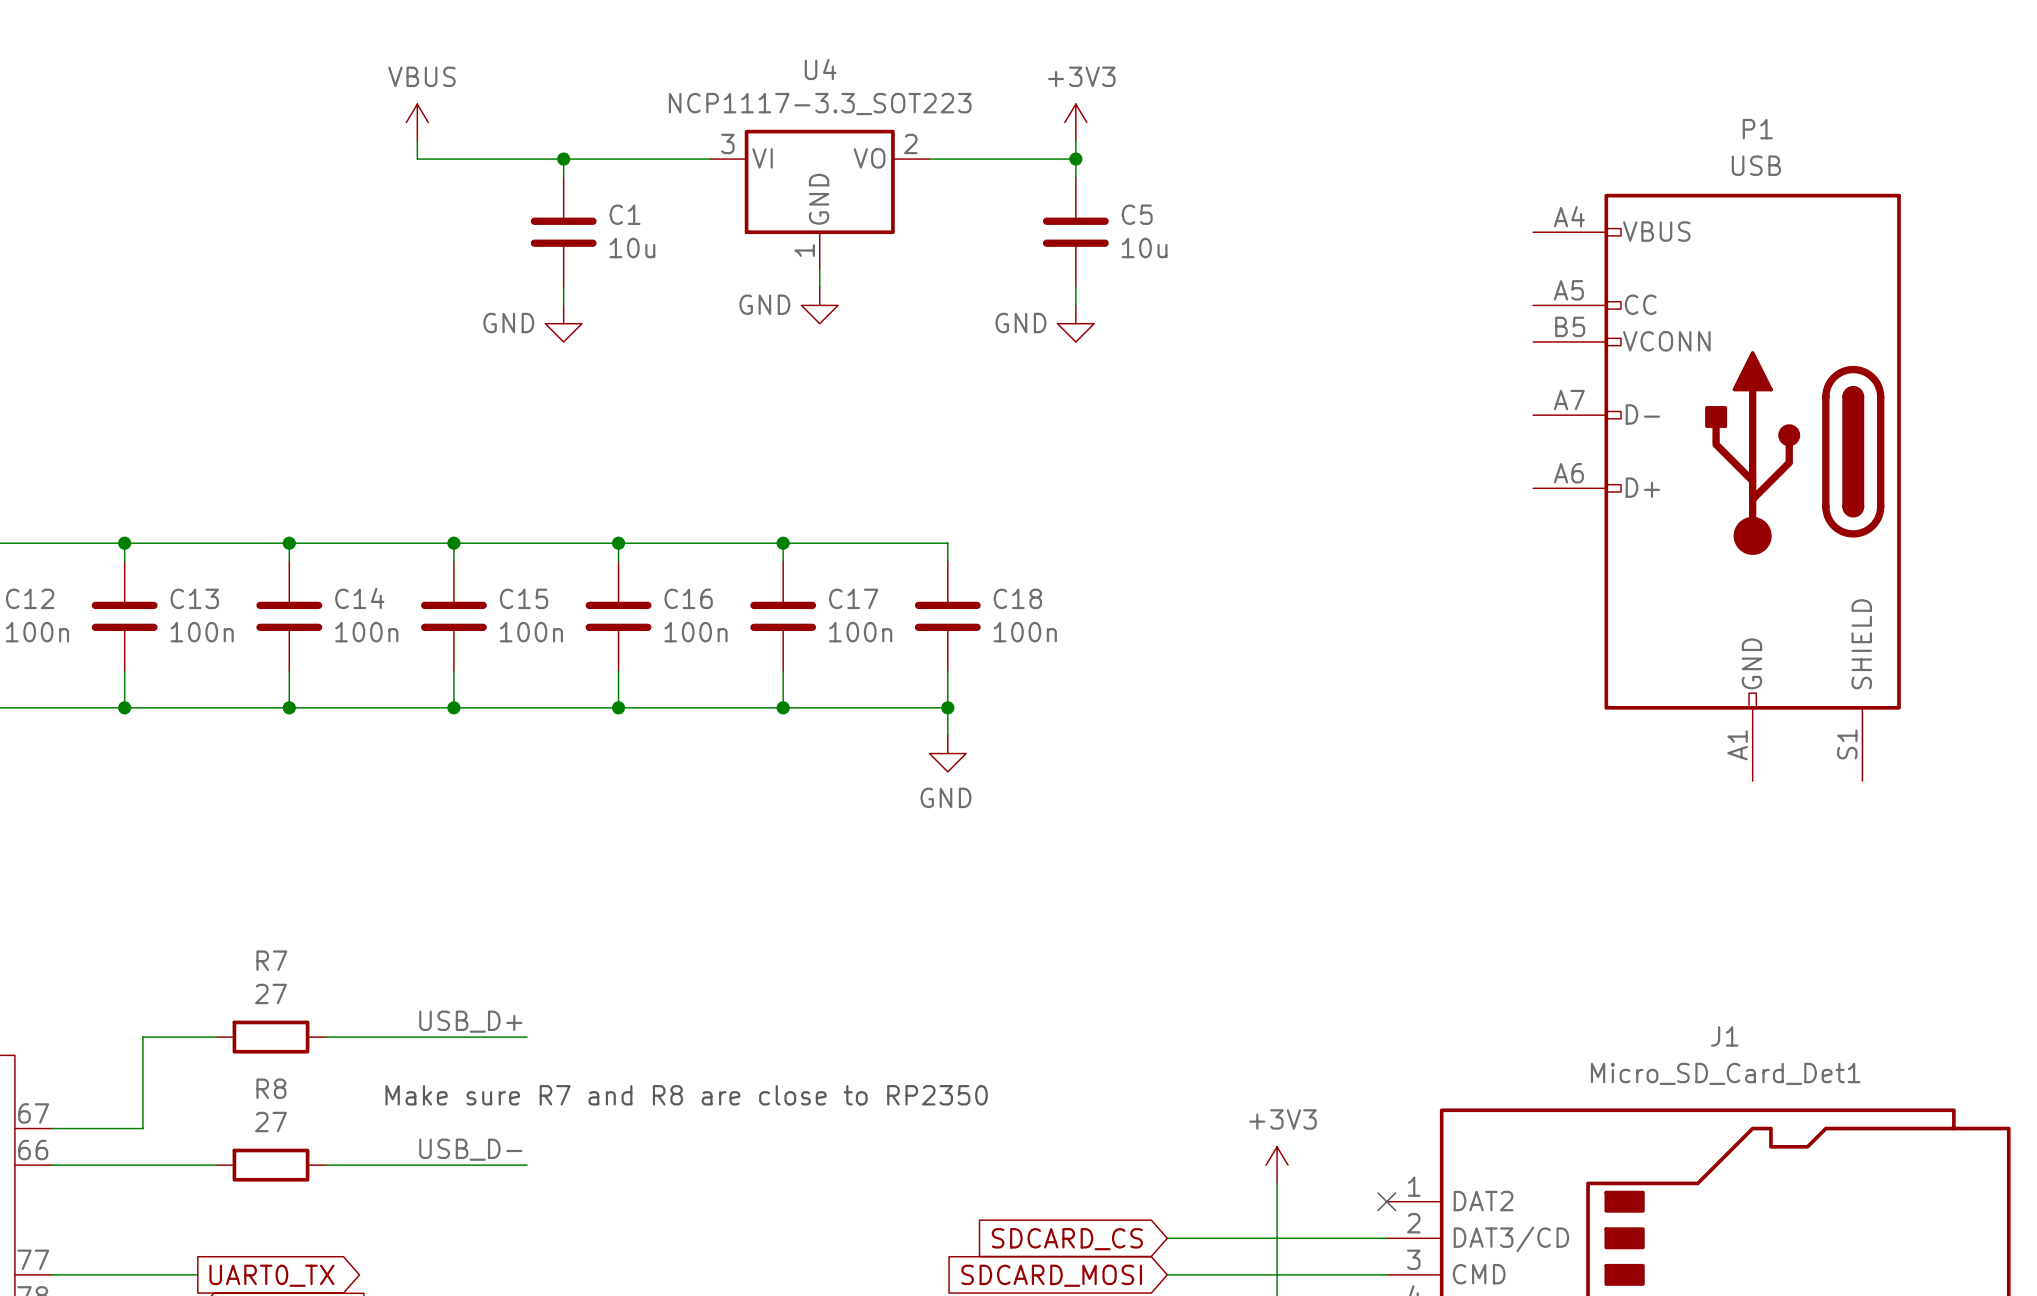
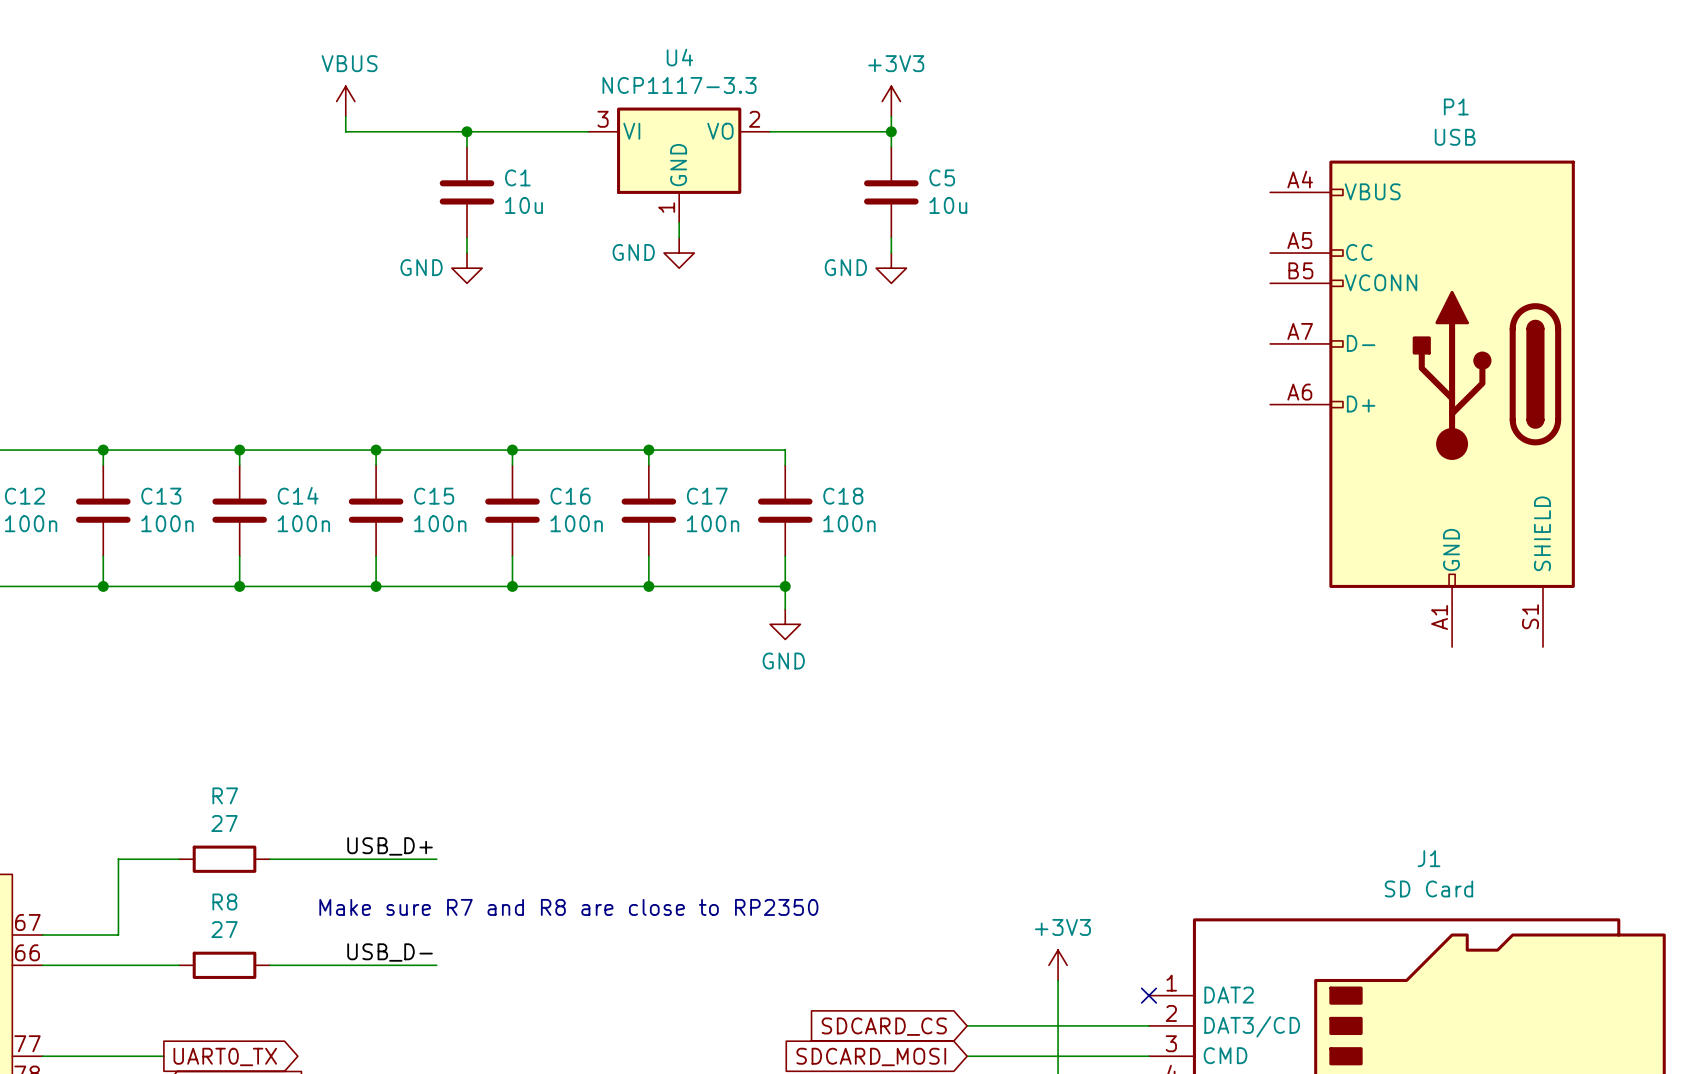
U4 value: NCP1117-3.3_SOT223 (820, 104) -> NCP1117-3.3 (679, 85)
J1 value: Micro_SD_Card_Det1 (1725, 1073) -> SD Card (1428, 888)

